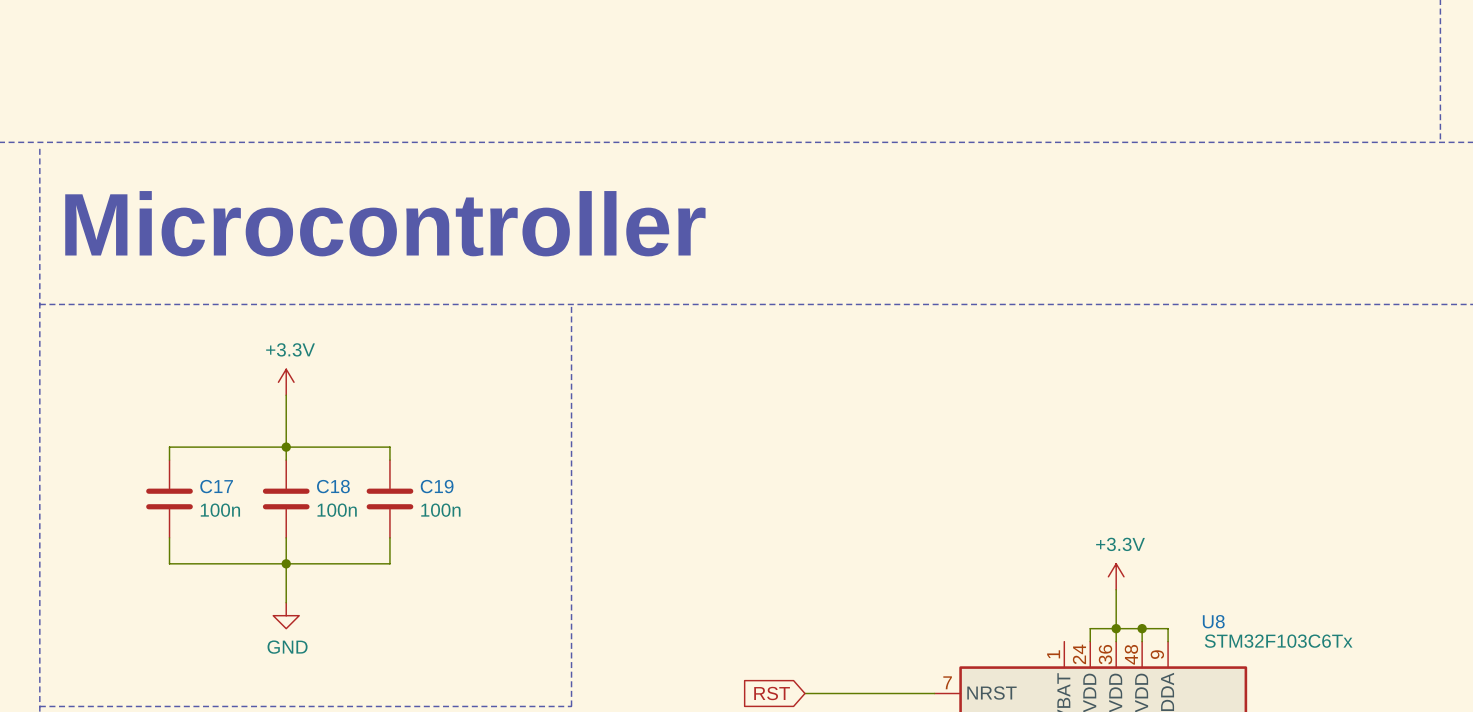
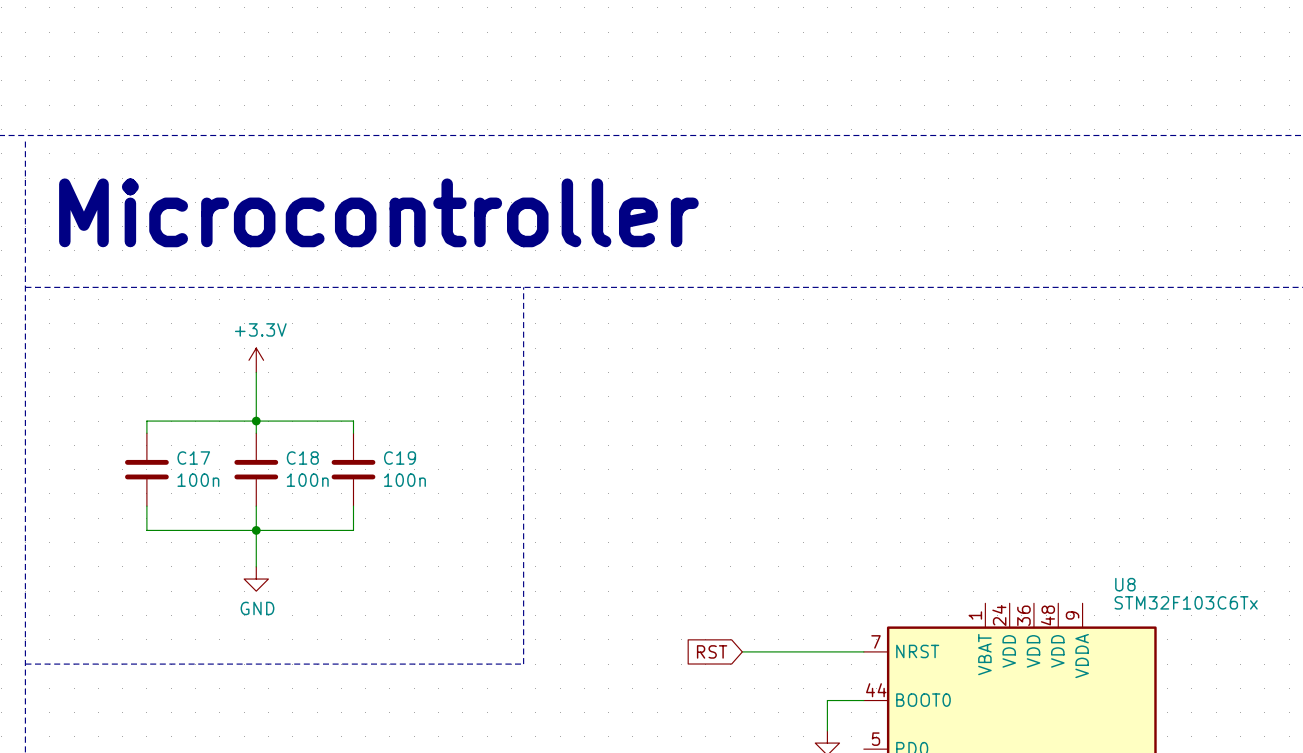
power symbol: +3.3V (1116, 576) -> none
wire: (1116, 589) (1116, 641) -> none
junction: (1116, 628) -> none
wire: (1142, 628) (1142, 641) -> none
junction: (1142, 628) -> none
wire: (1090, 641) (1090, 628) (1168, 628) (1168, 641) -> none

